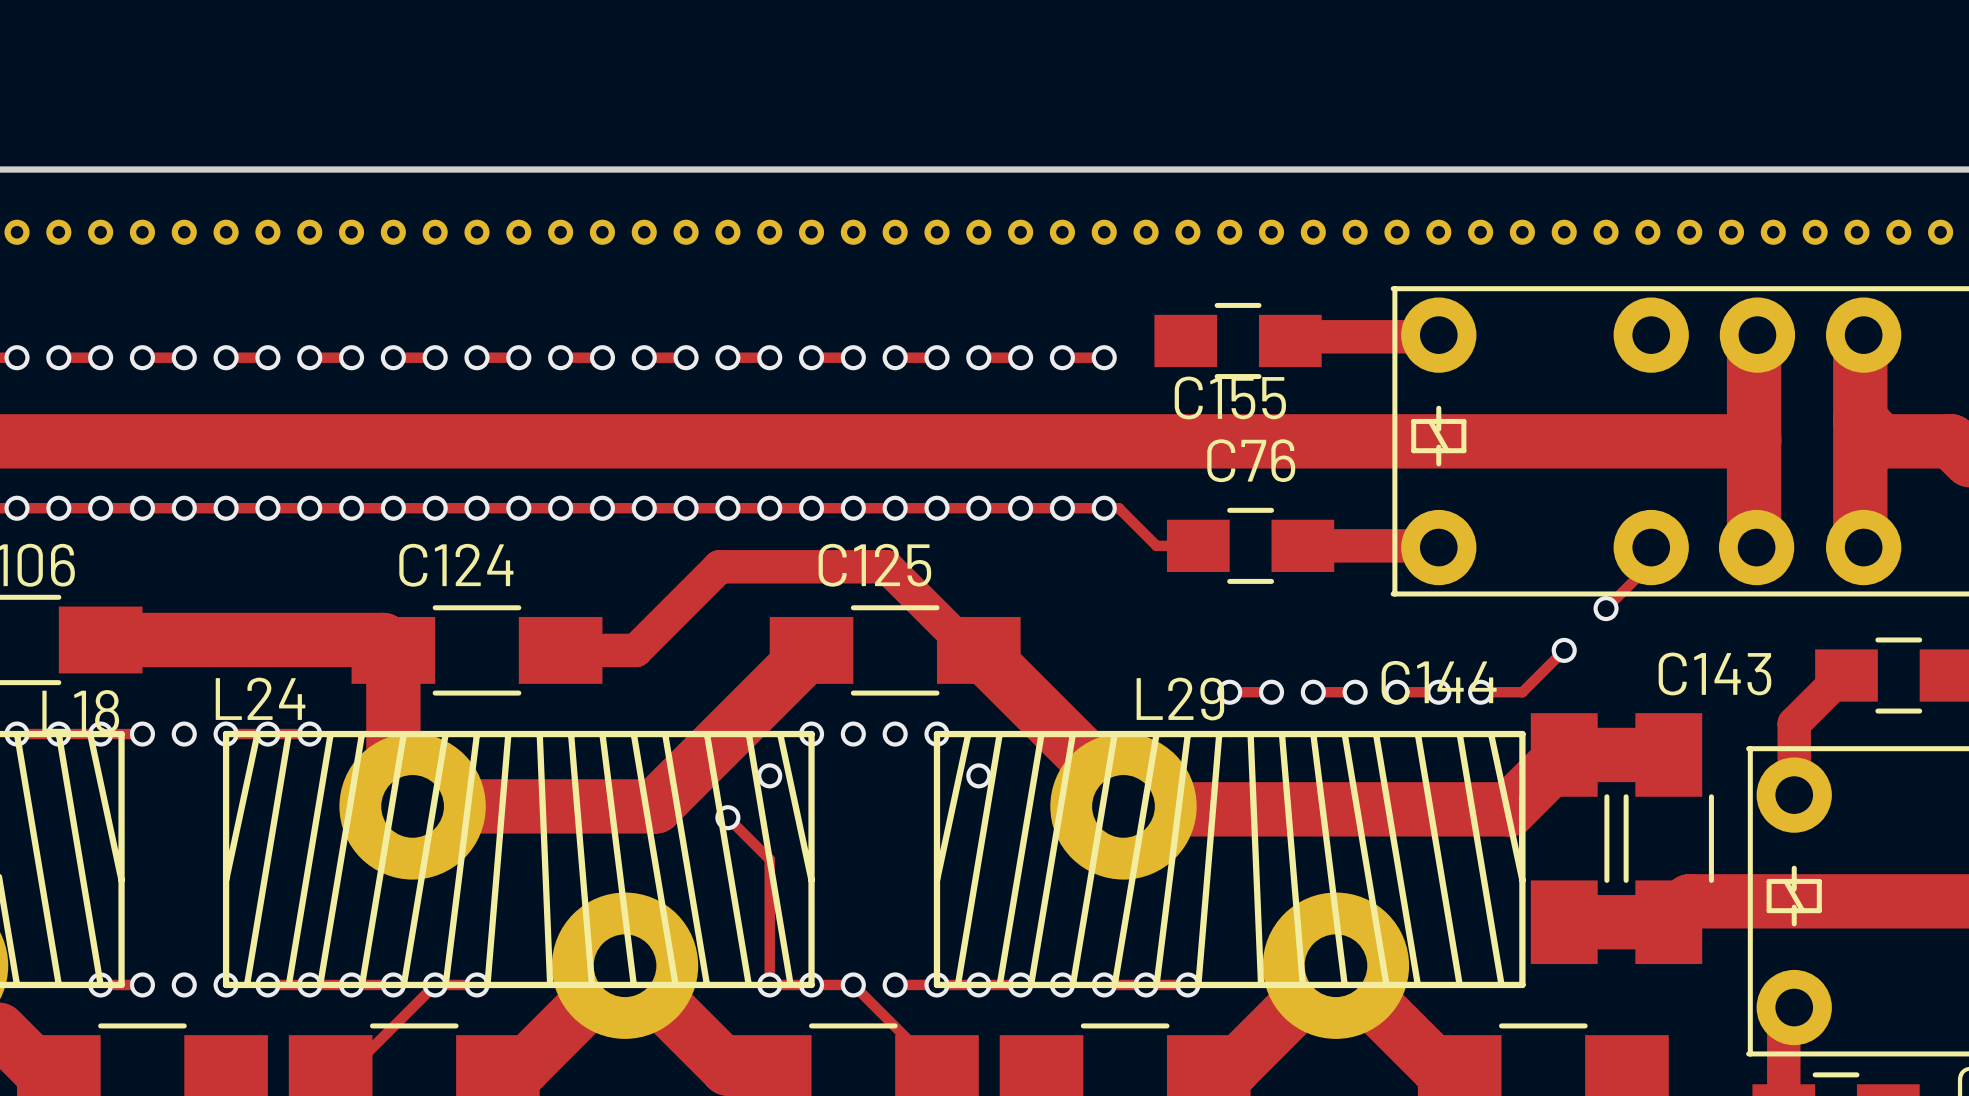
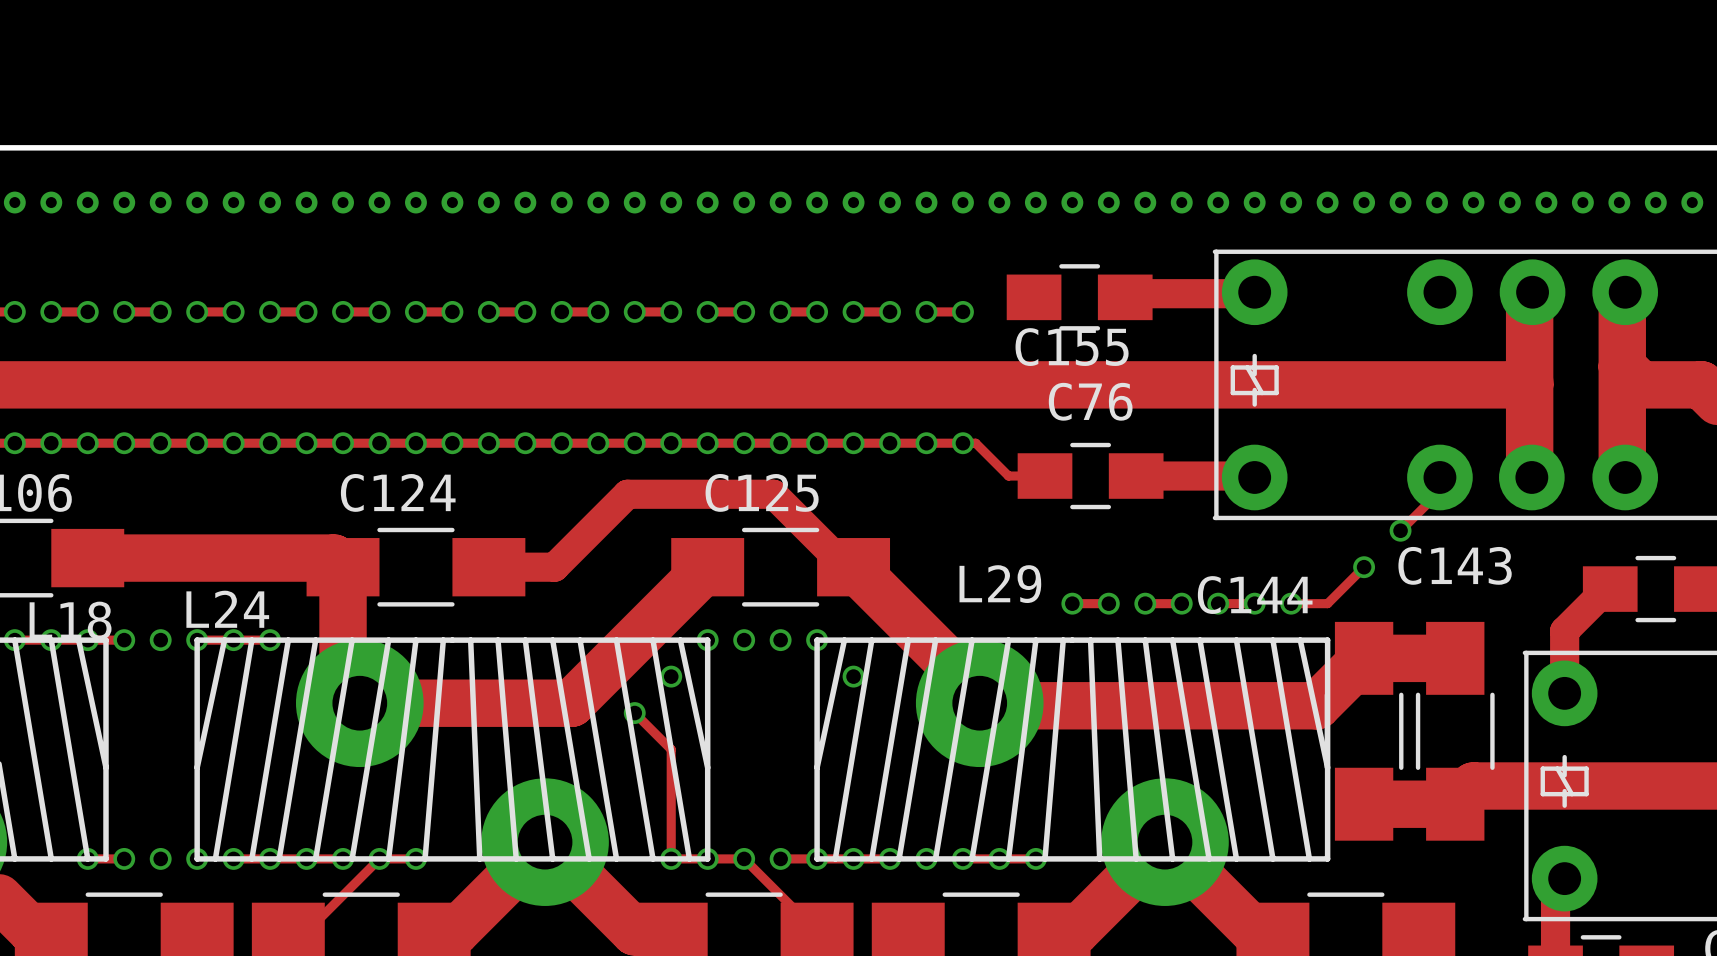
C143 name position: C143 (1714, 673) -> C143 (1455, 565)
L29 name position: L29 (1180, 699) -> L29 (1000, 584)

